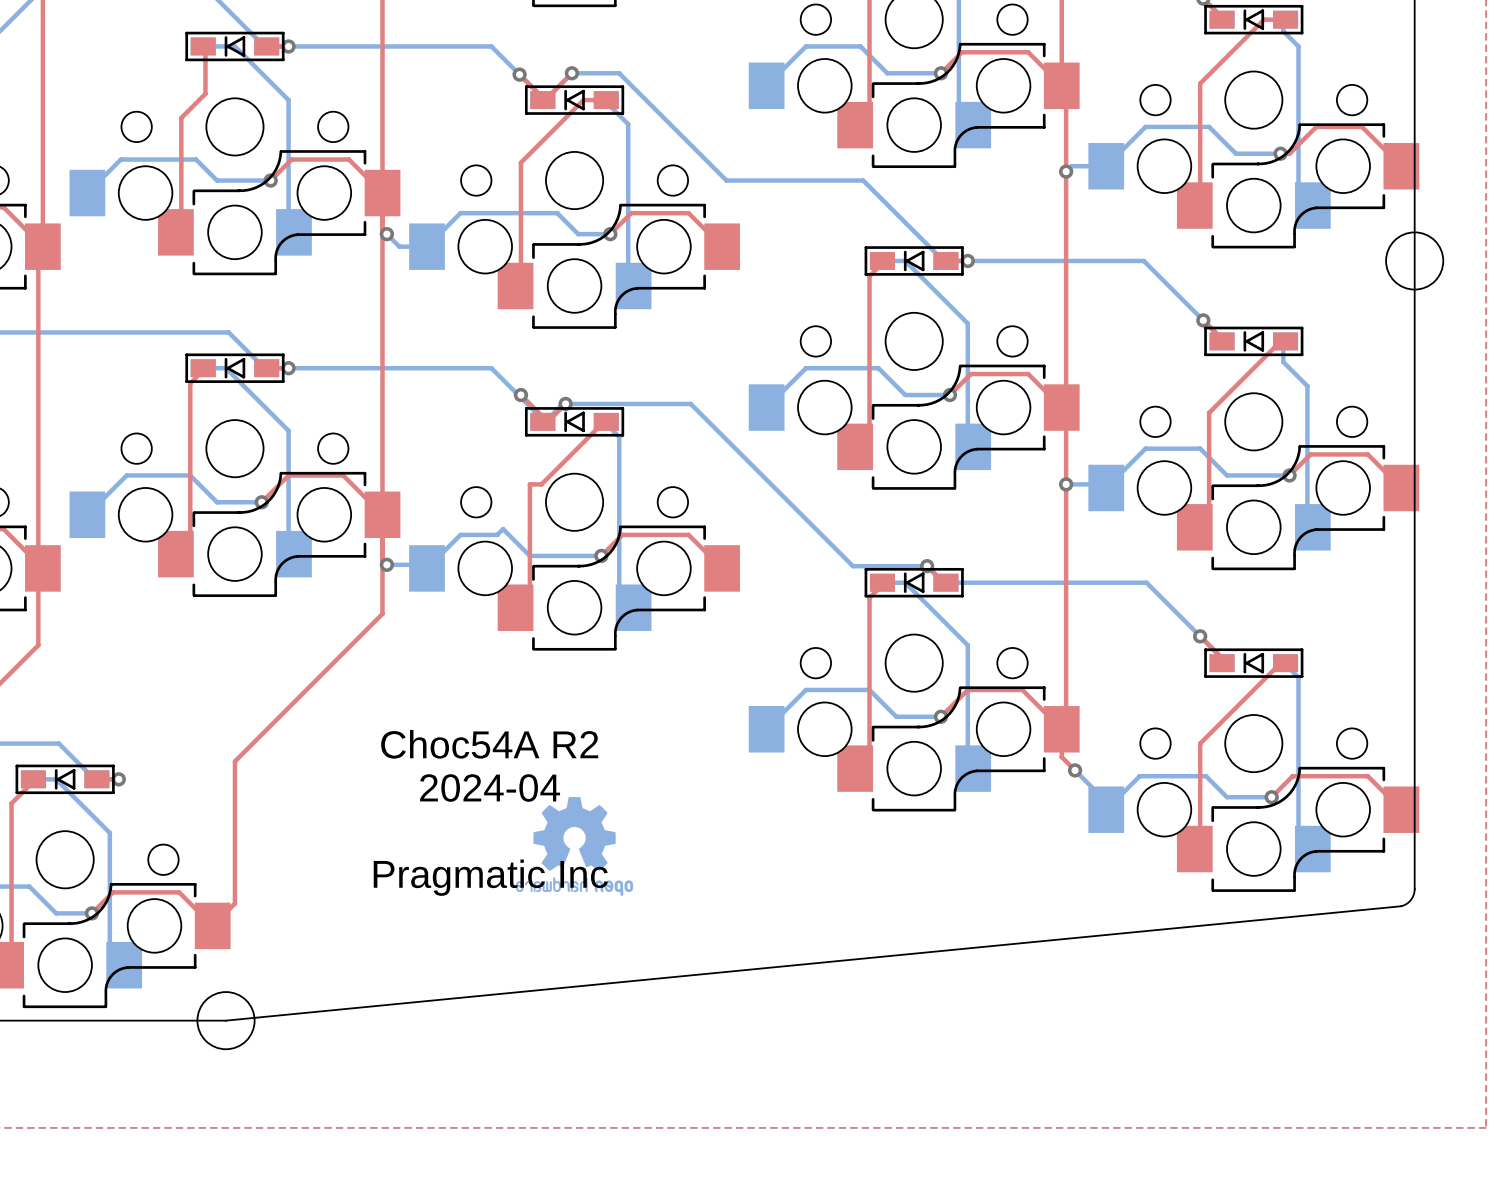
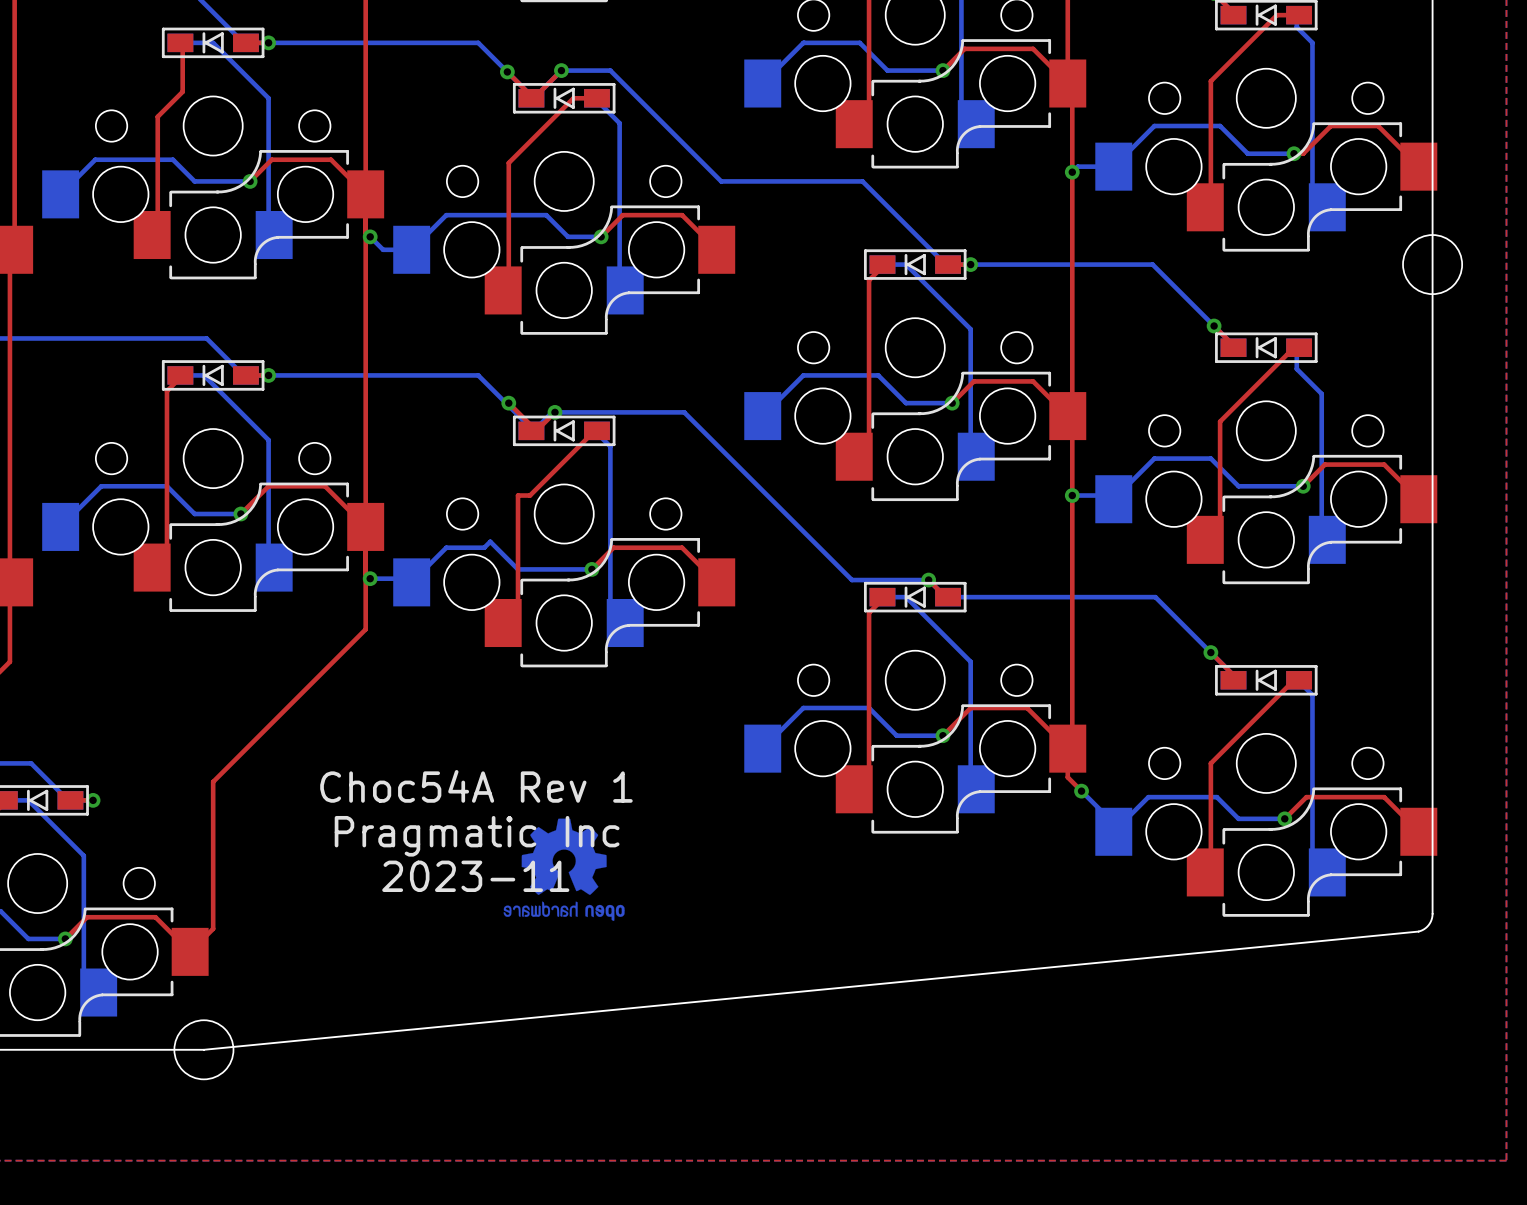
text: Choc54A R2 (489, 744) -> Choc54A Rev 1 (476, 786)
text: 2024-04 (490, 788) -> none
text: none -> 2023-11 (475, 876)
text position: Pragmatic Inc (490, 877) -> Pragmatic Inc (477, 836)

